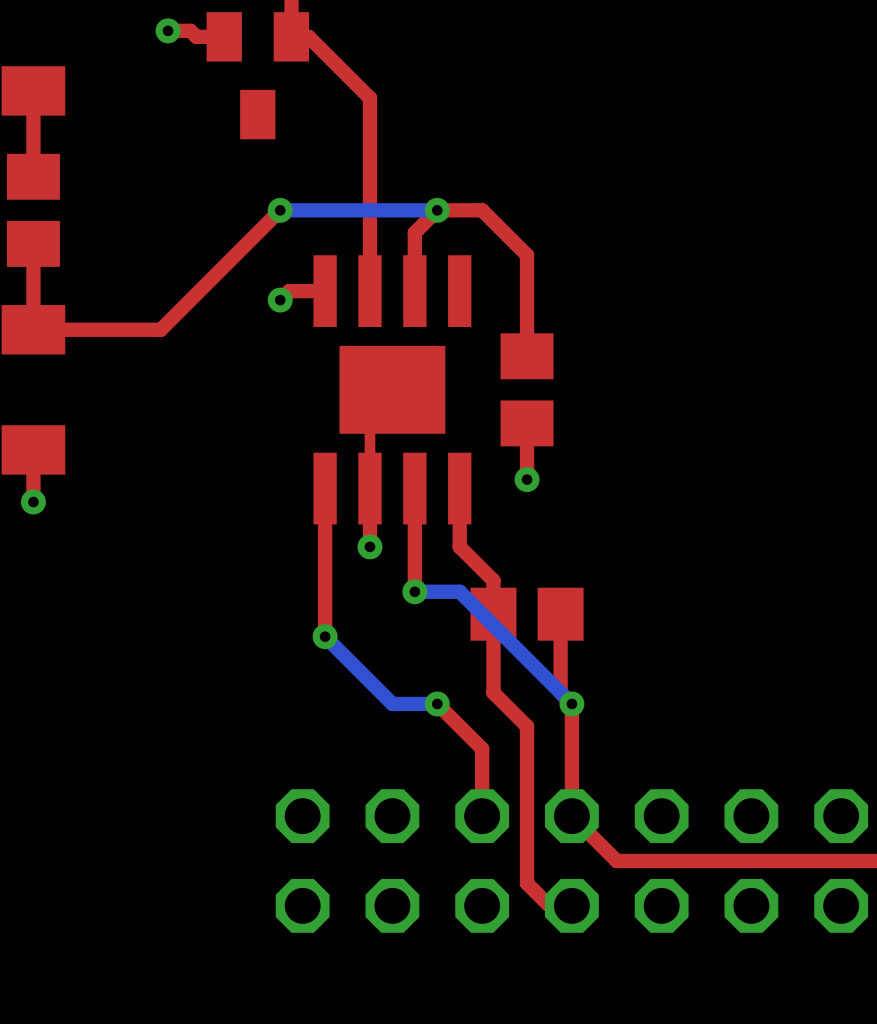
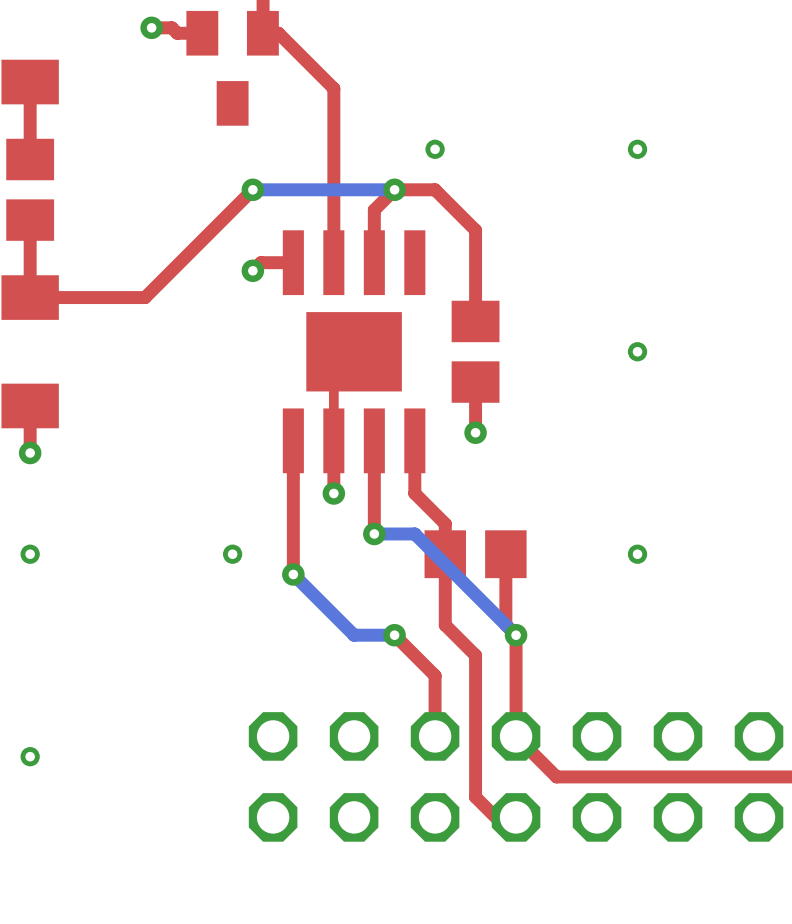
via: none -> (435, 149)
via: none -> (637, 149)
via: none -> (637, 351)
via: none -> (30, 554)
via: none -> (232, 554)
via: none -> (637, 554)
via: none -> (30, 756)

